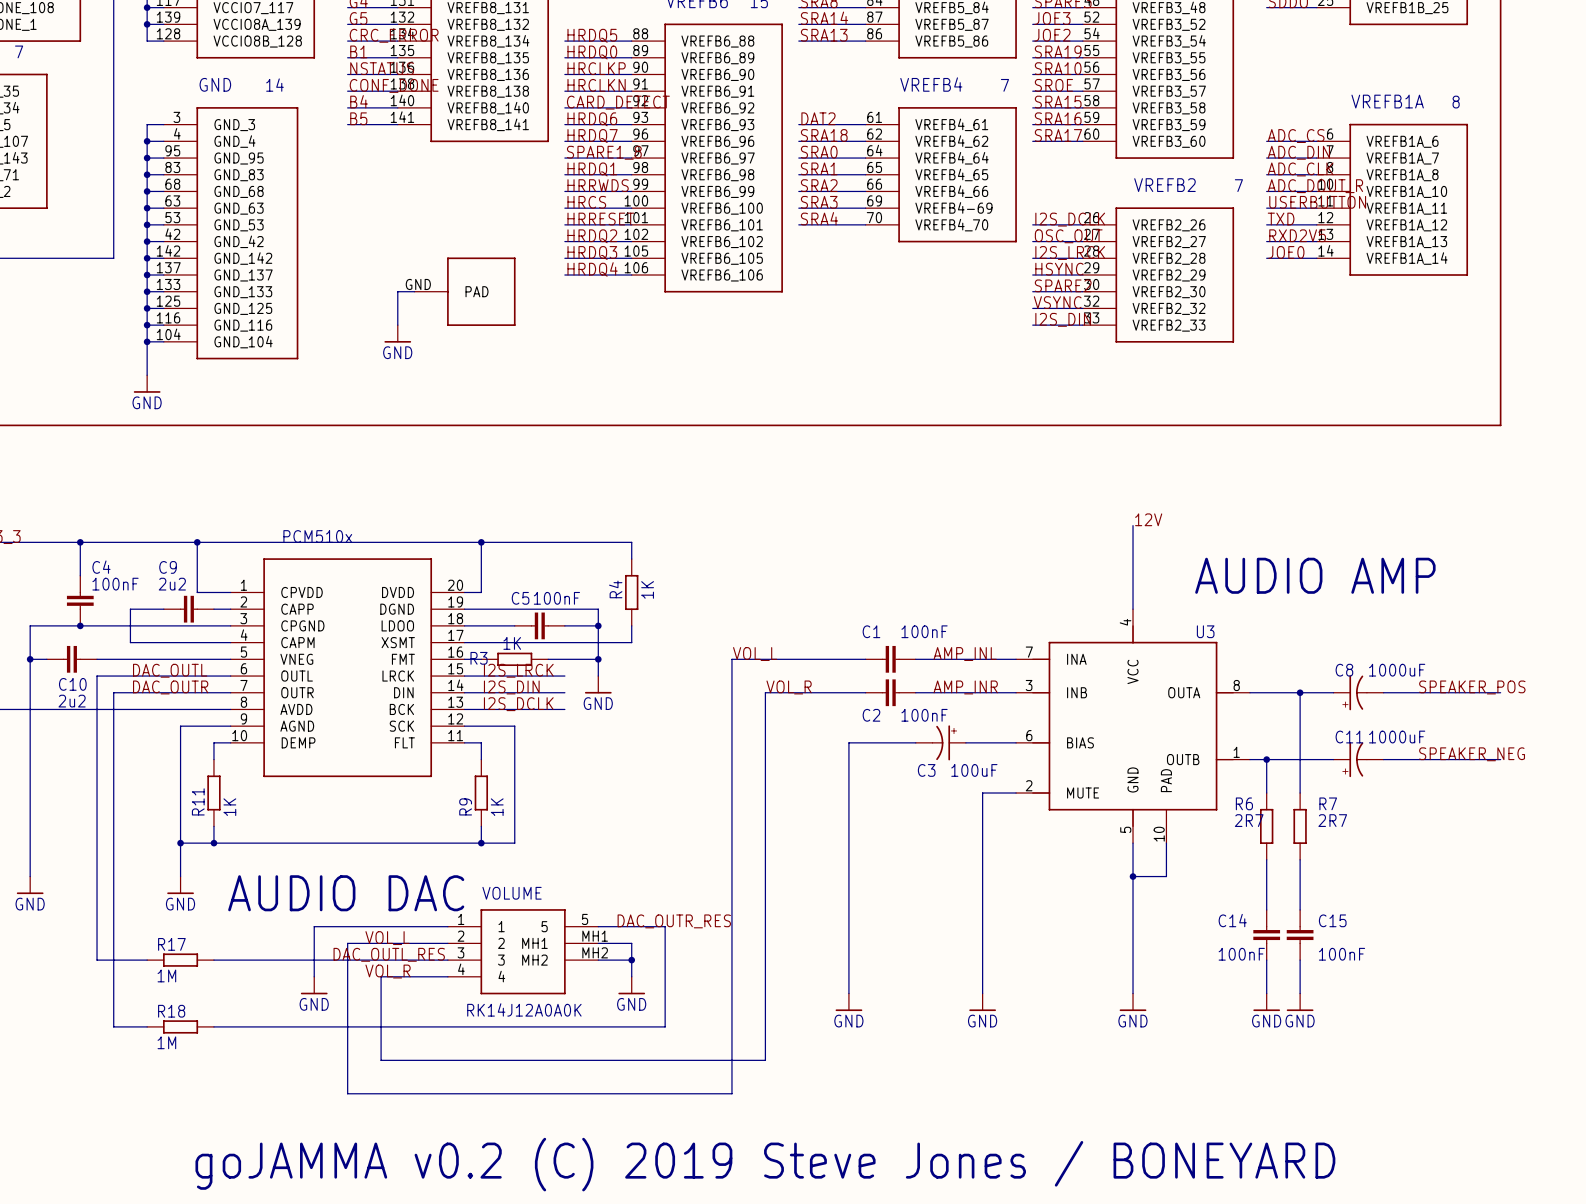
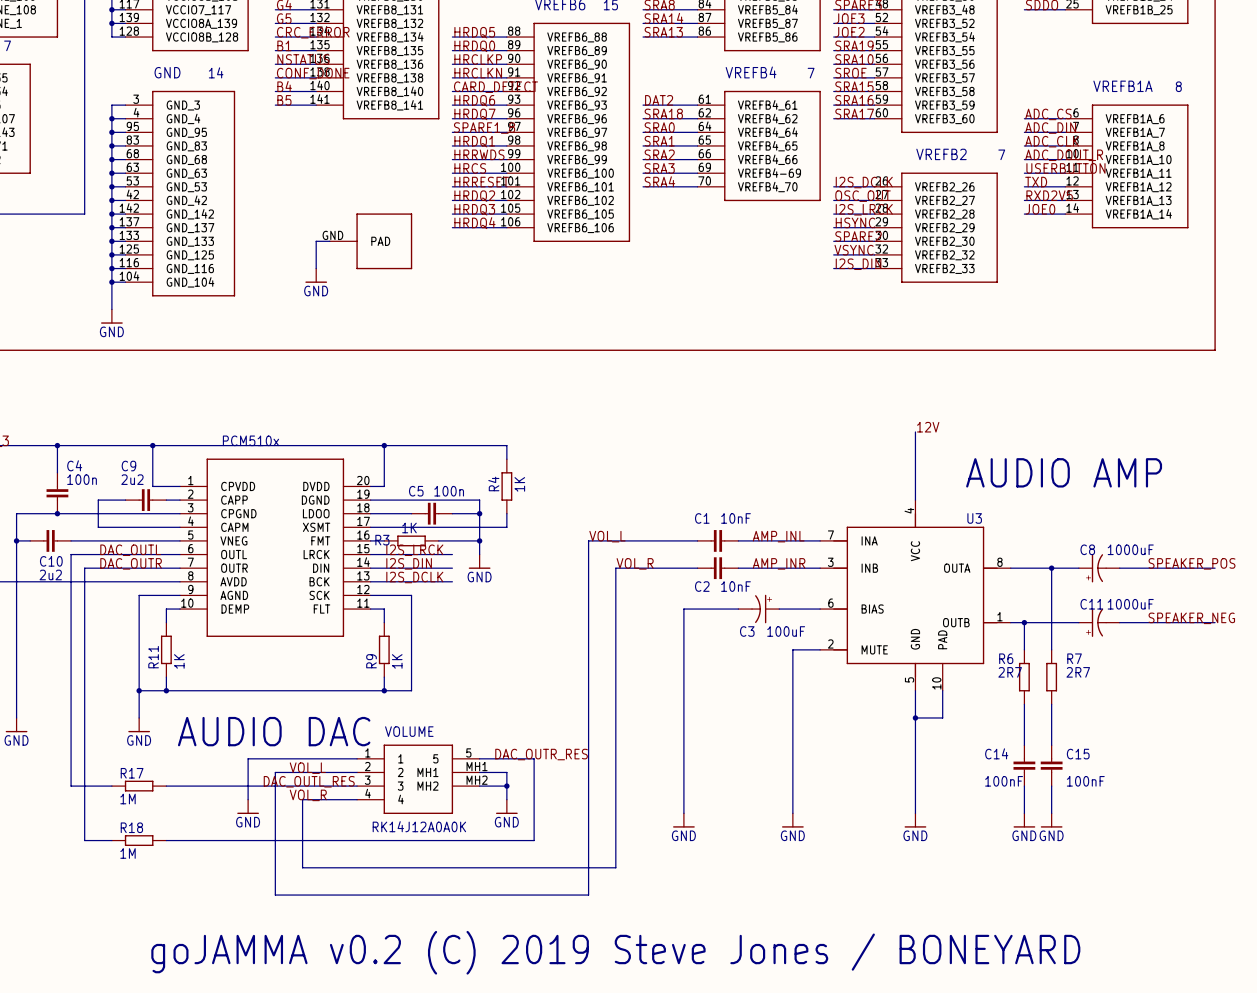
C4 value: 100nF (115, 584) -> 100n (82, 479)
C5 value: 100nF (556, 598) -> 100n (449, 491)
C1 value: 100nF (924, 631) -> 10nF (735, 586)
C2 value: 100nF (924, 715) -> 10nF (735, 518)

